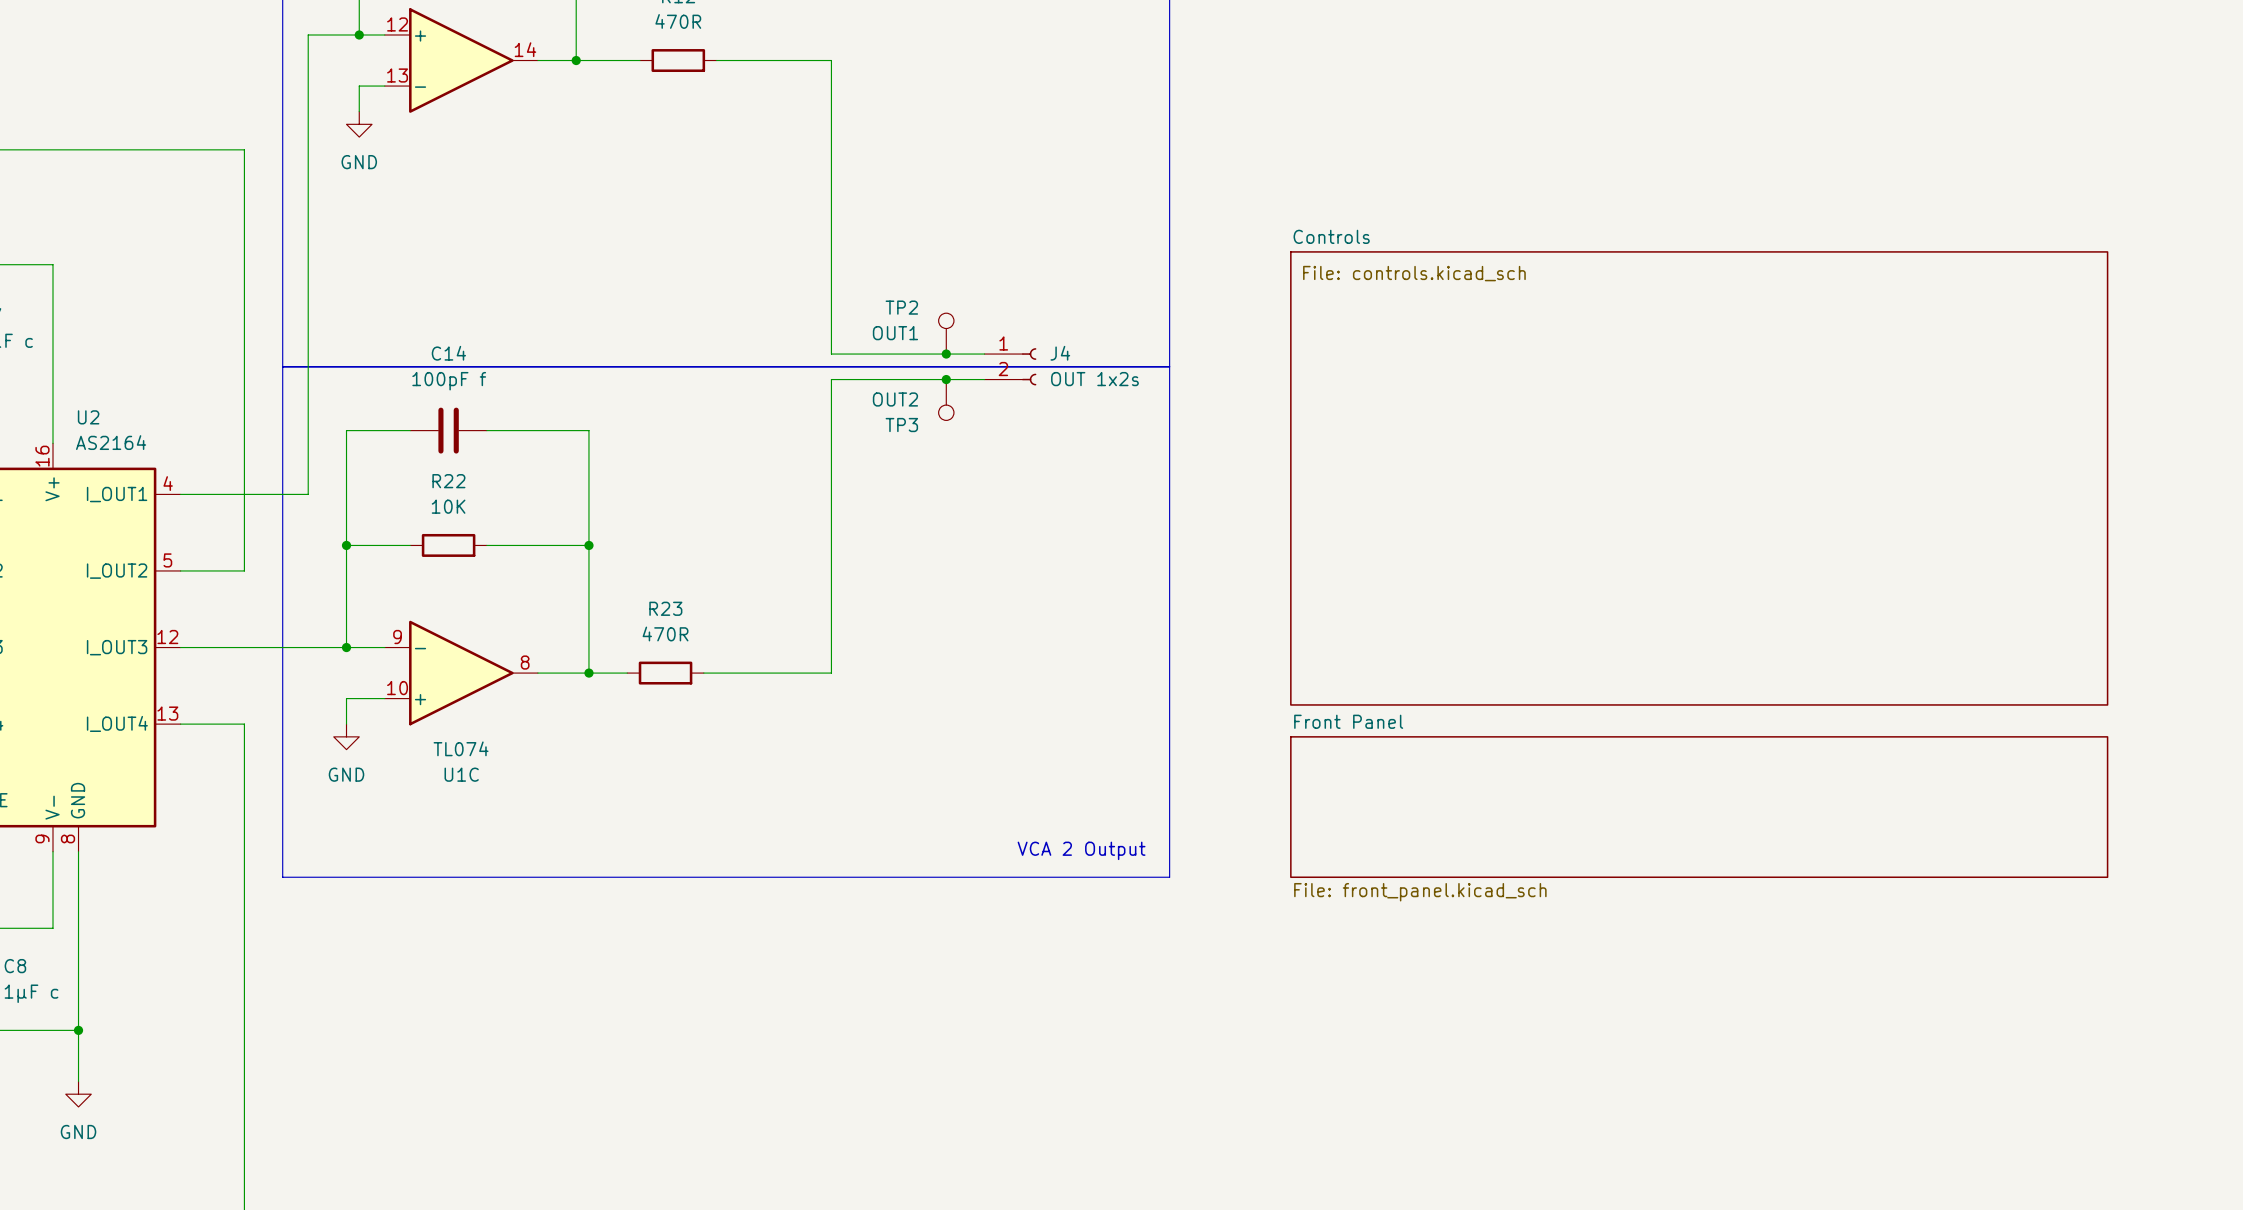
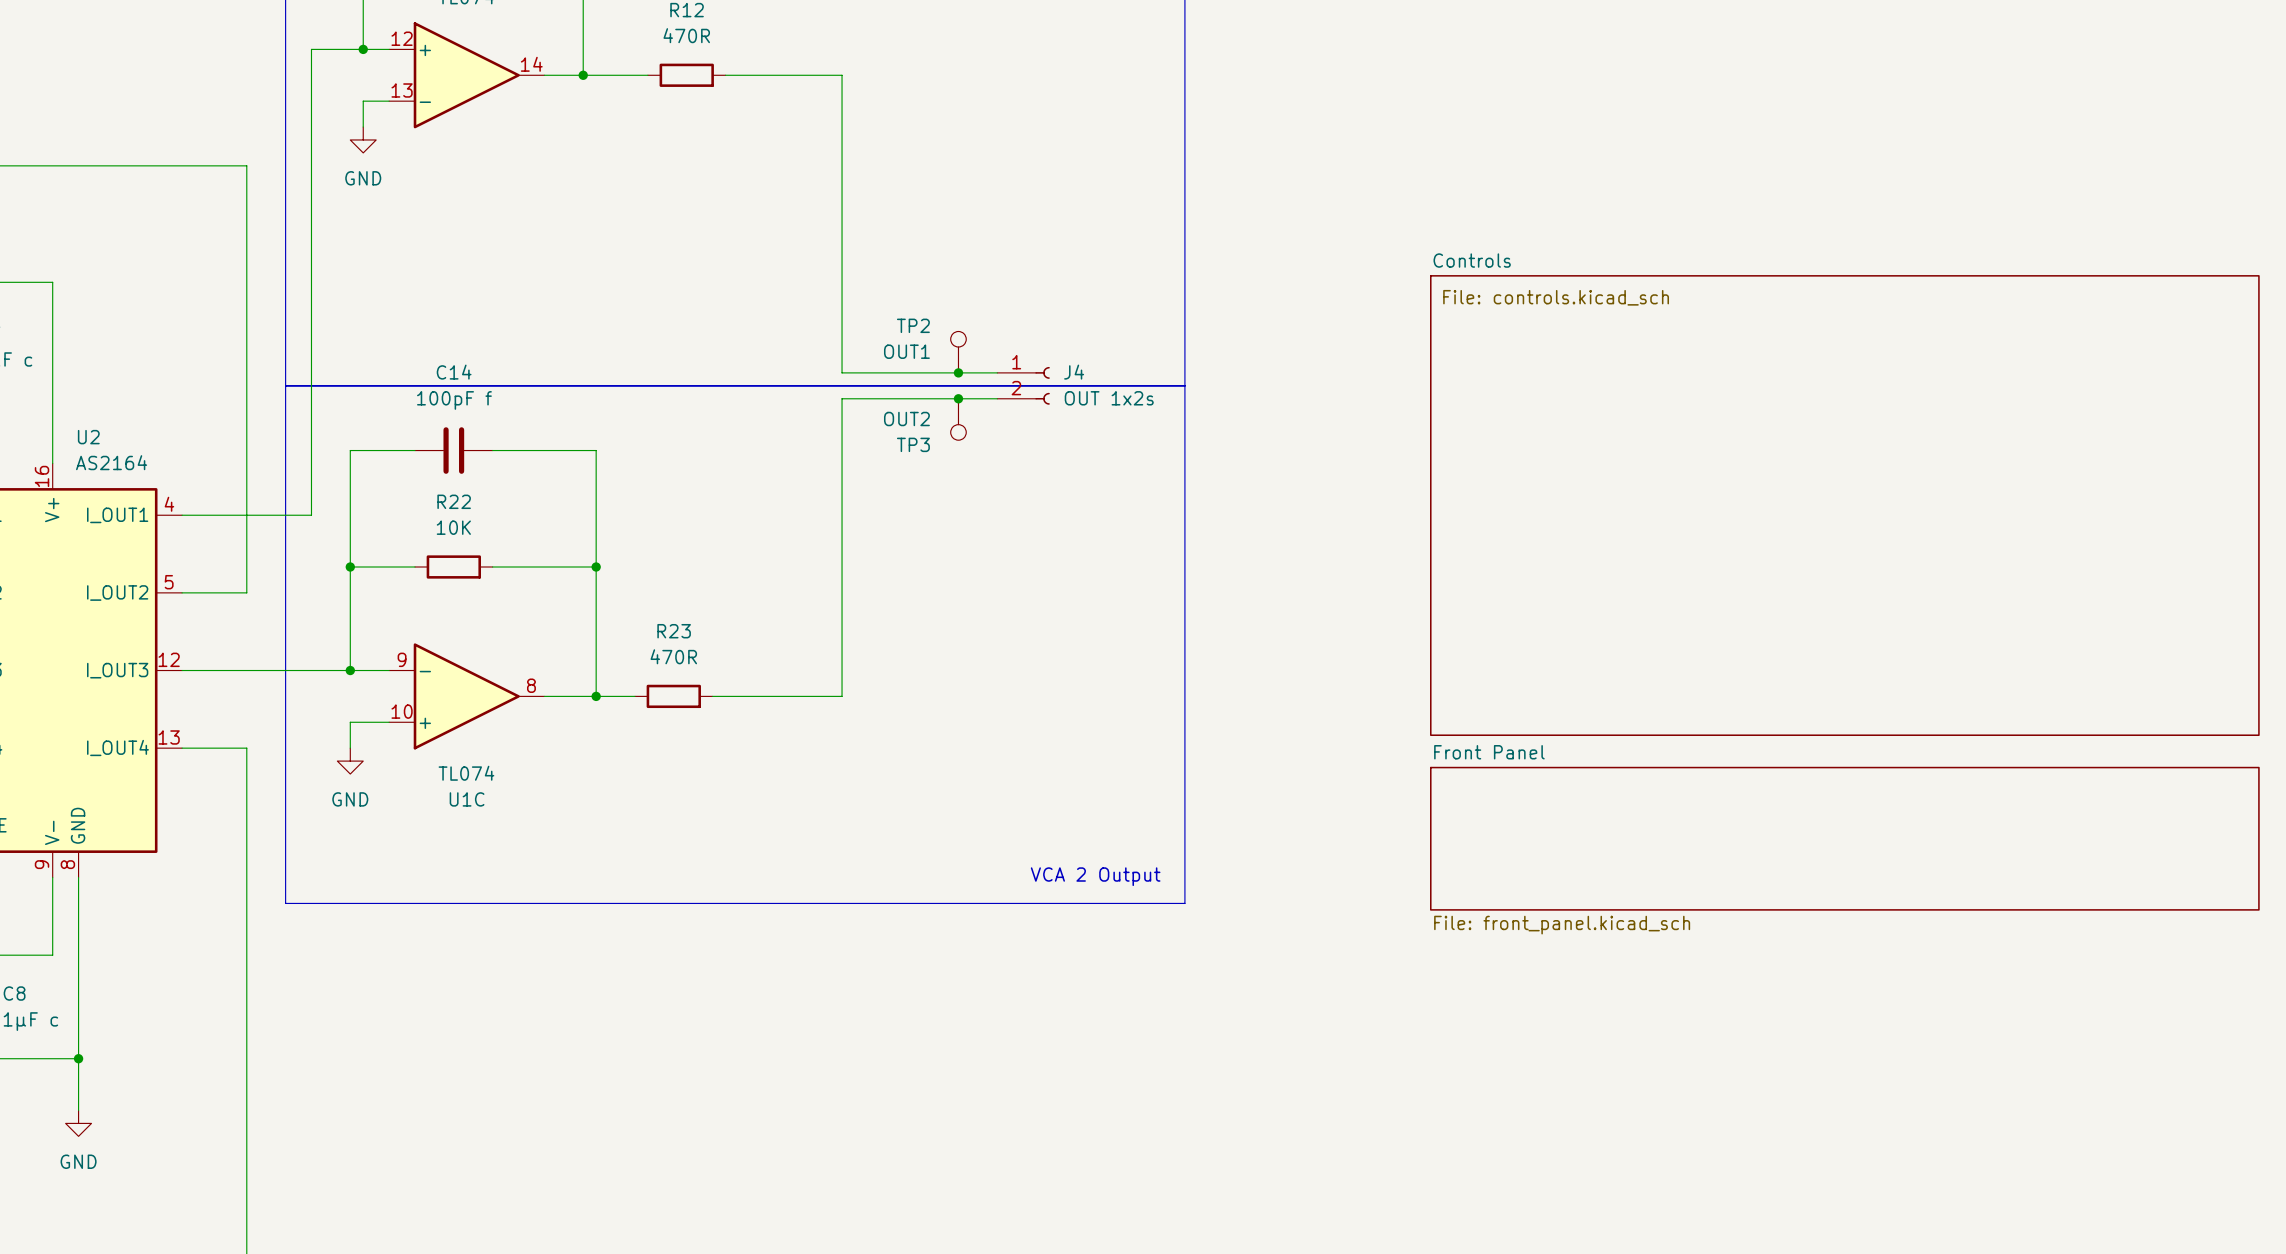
sheet Controls position: (1699, 478) -> (1844, 505)
sheet Front Panel position: (1699, 807) -> (1844, 838)

